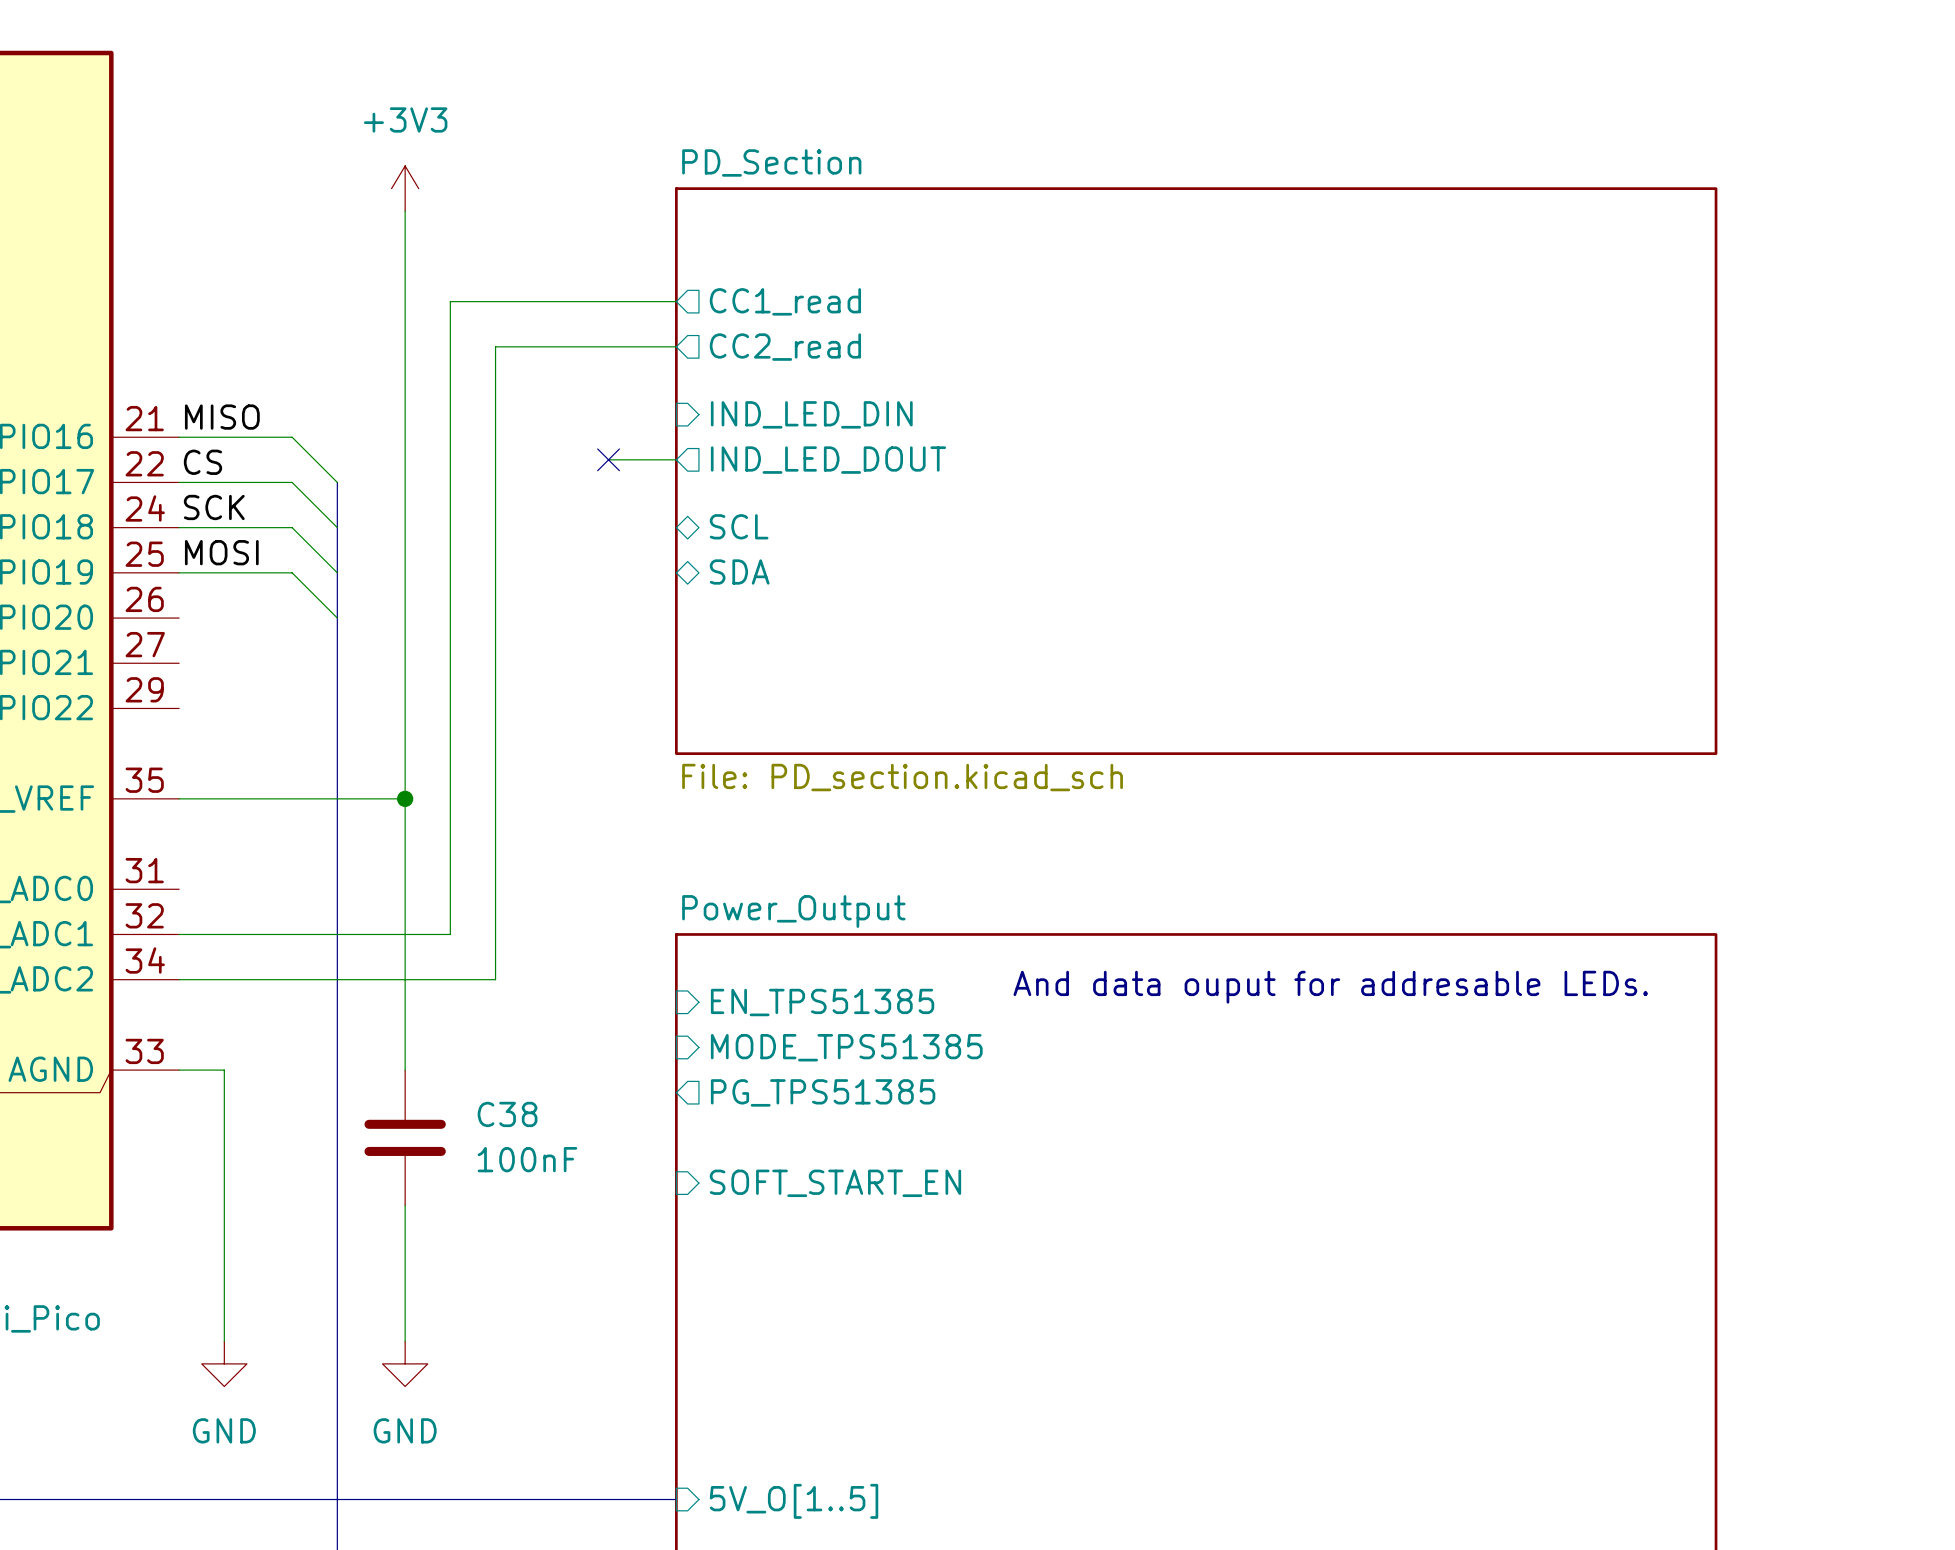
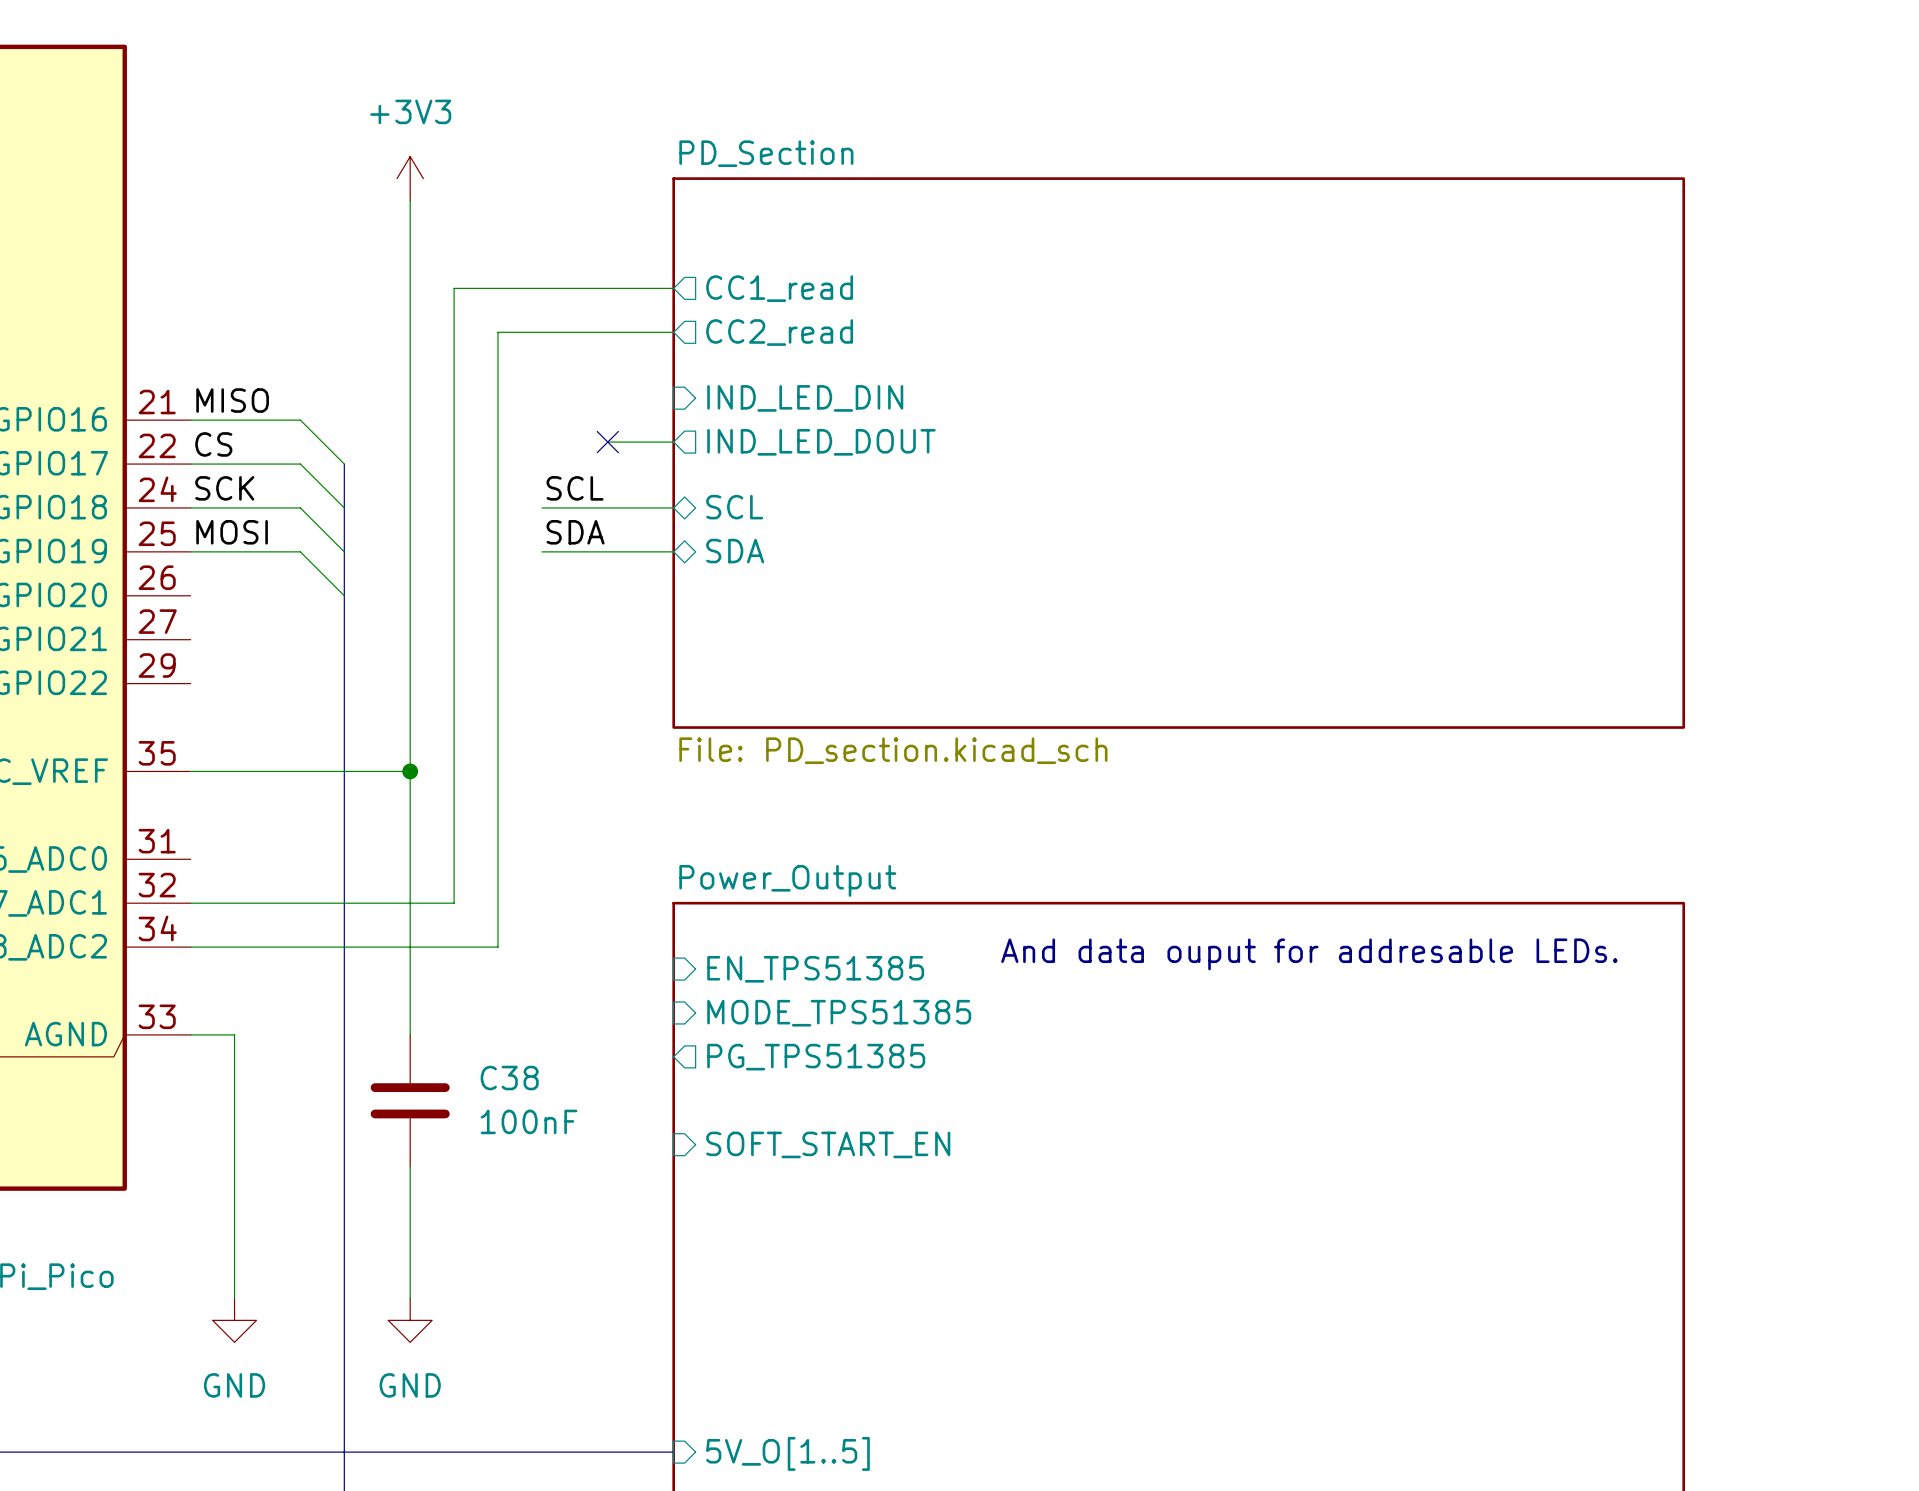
label: none -> SCL (575, 488)
wire: none -> (541, 507) (673, 507)
label: none -> SDA (575, 532)
wire: none -> (541, 551) (673, 551)

